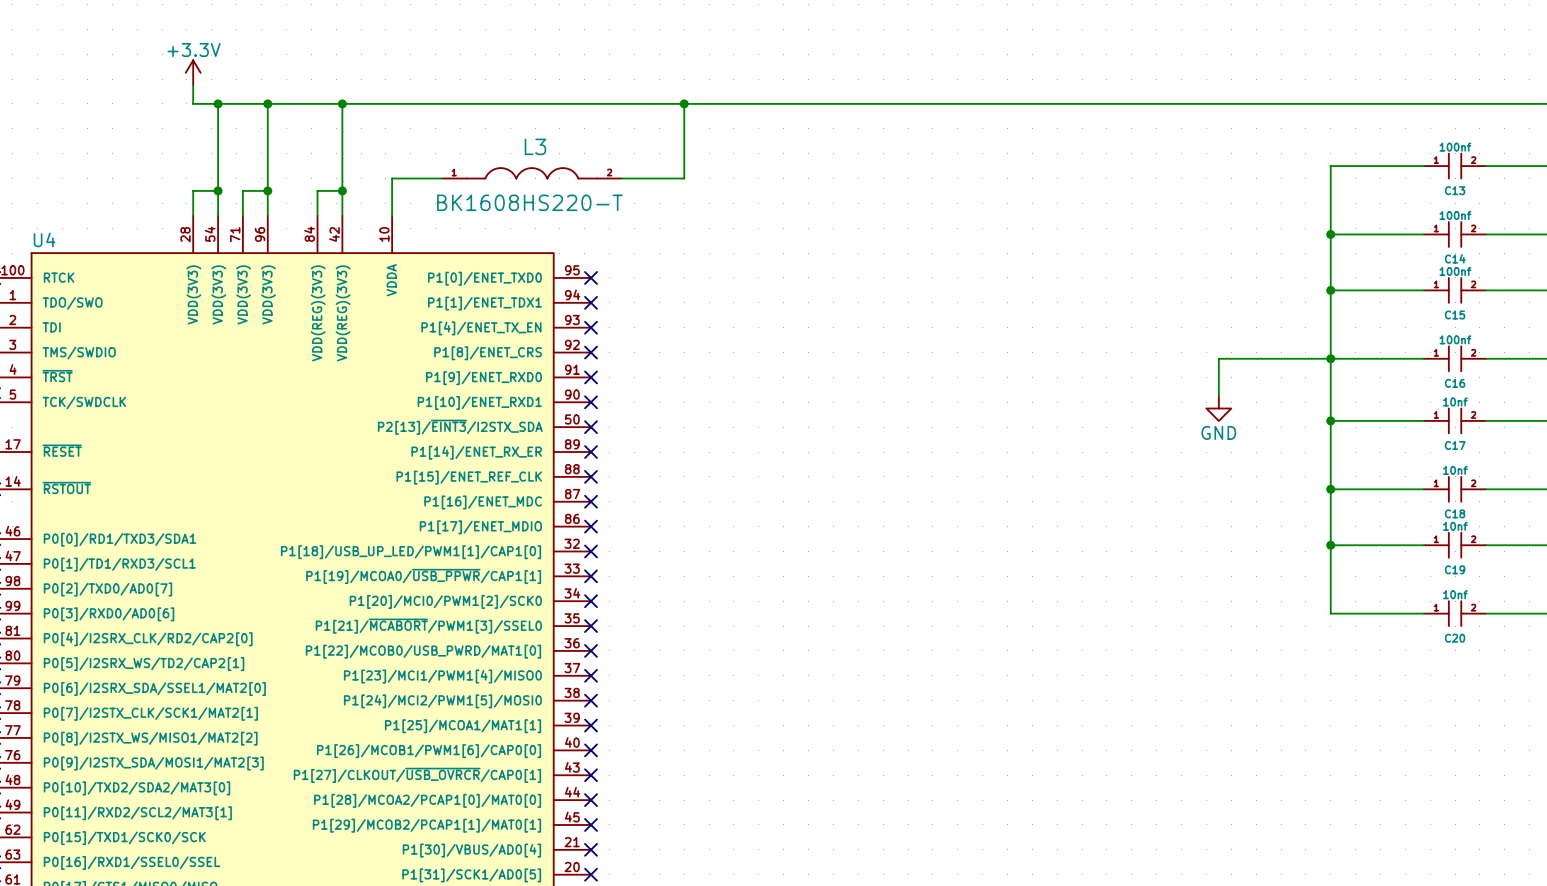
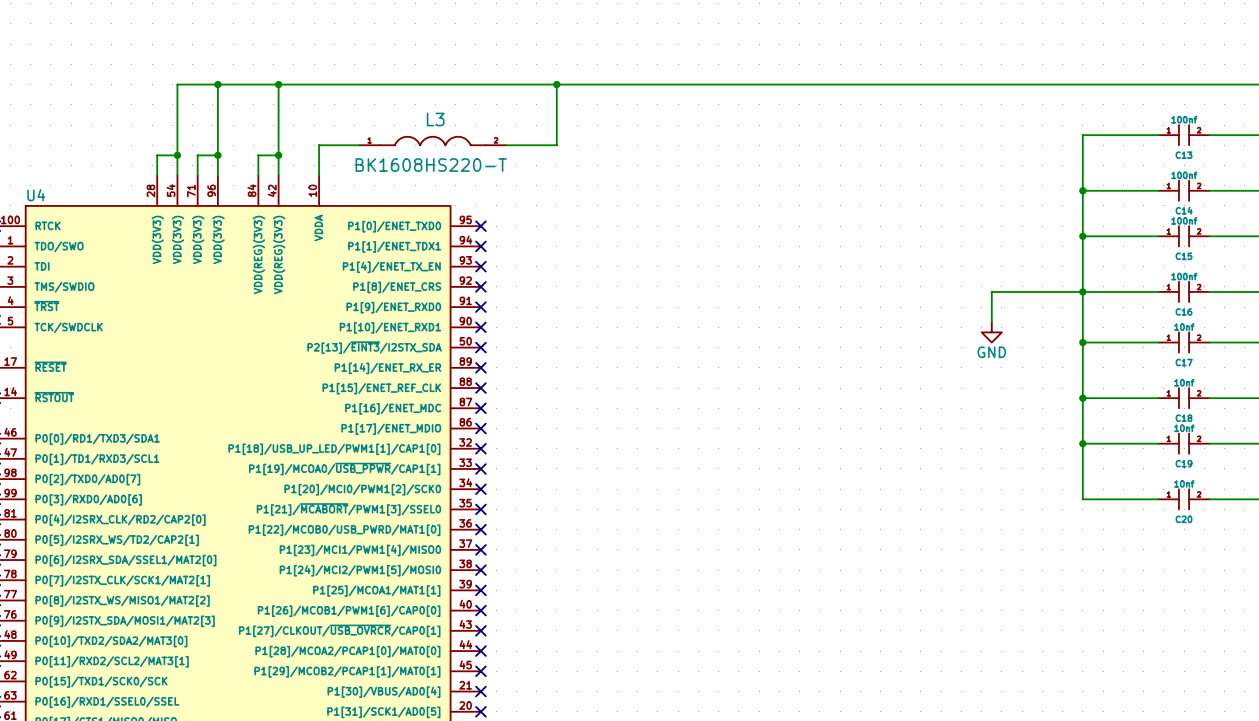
power symbol: +3.3V (193, 72) -> none
wire: (193, 85) (193, 103) (218, 103) -> none
junction: (218, 103) -> none

